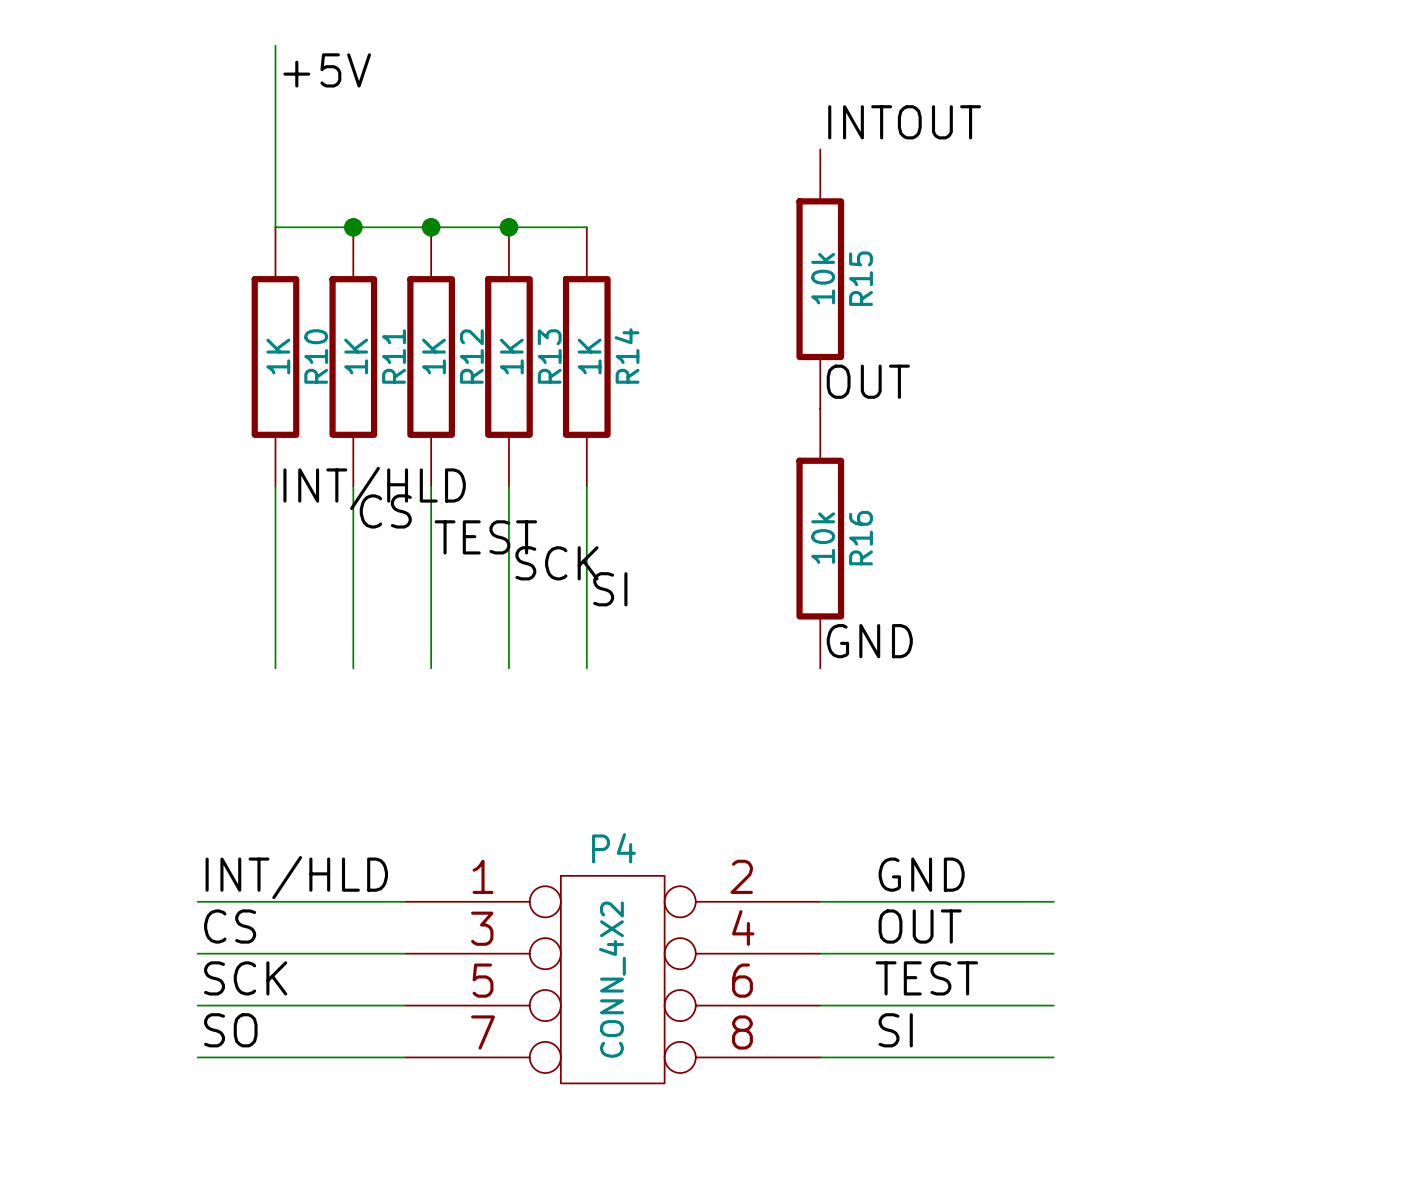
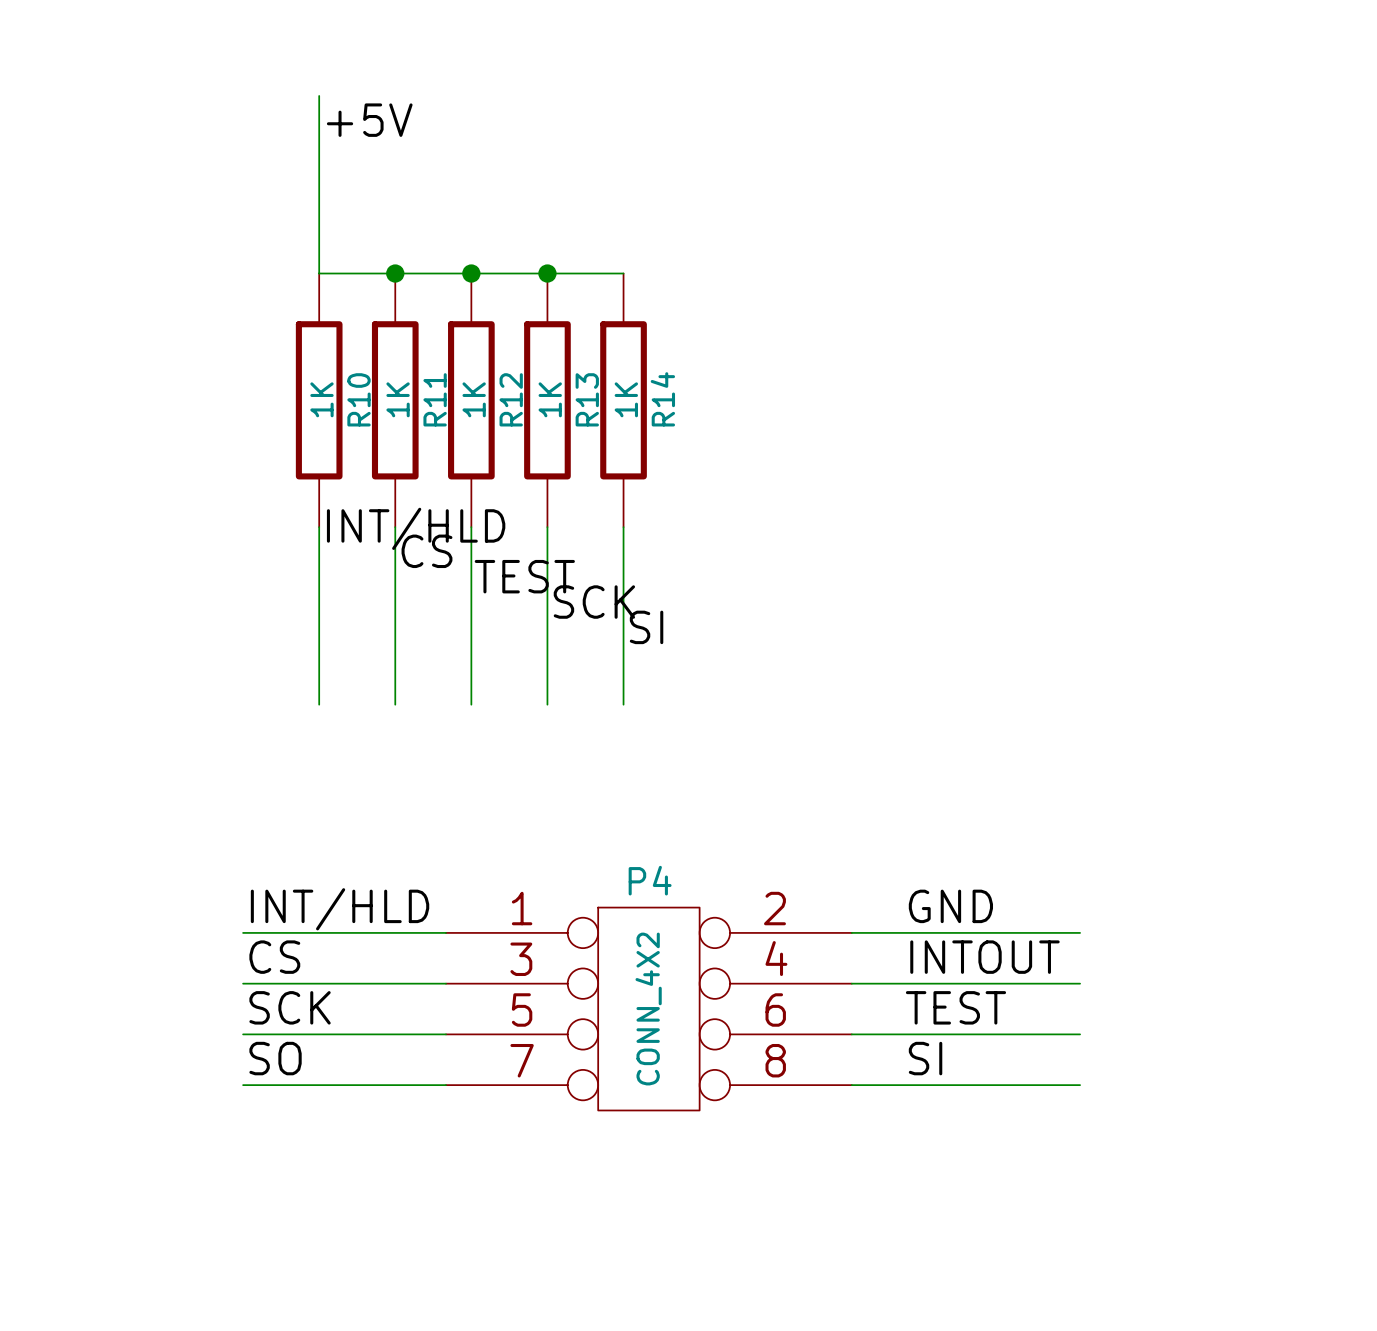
label: INTOUT (904, 122) -> none
R15: 10k (820, 279) -> none
label: OUT (868, 381) -> none
R16: 10k (820, 538) -> none
label: GND (869, 641) -> none
label: OUT (920, 926) -> INTOUT (984, 957)

